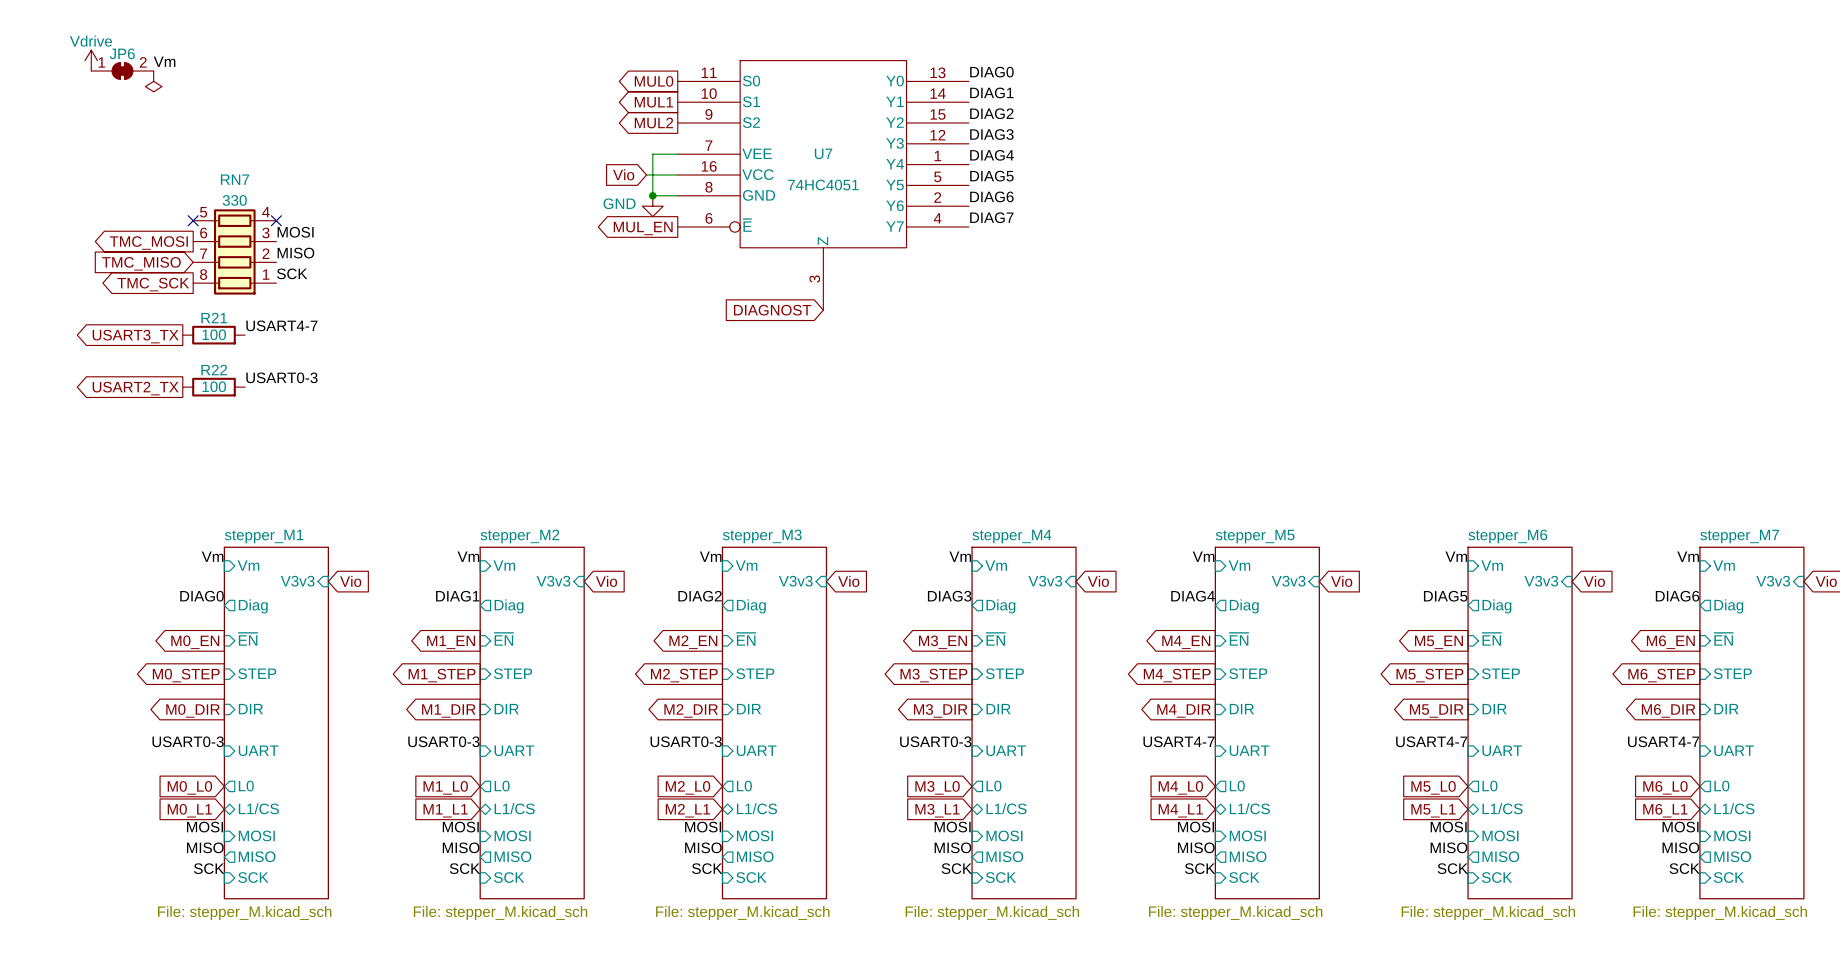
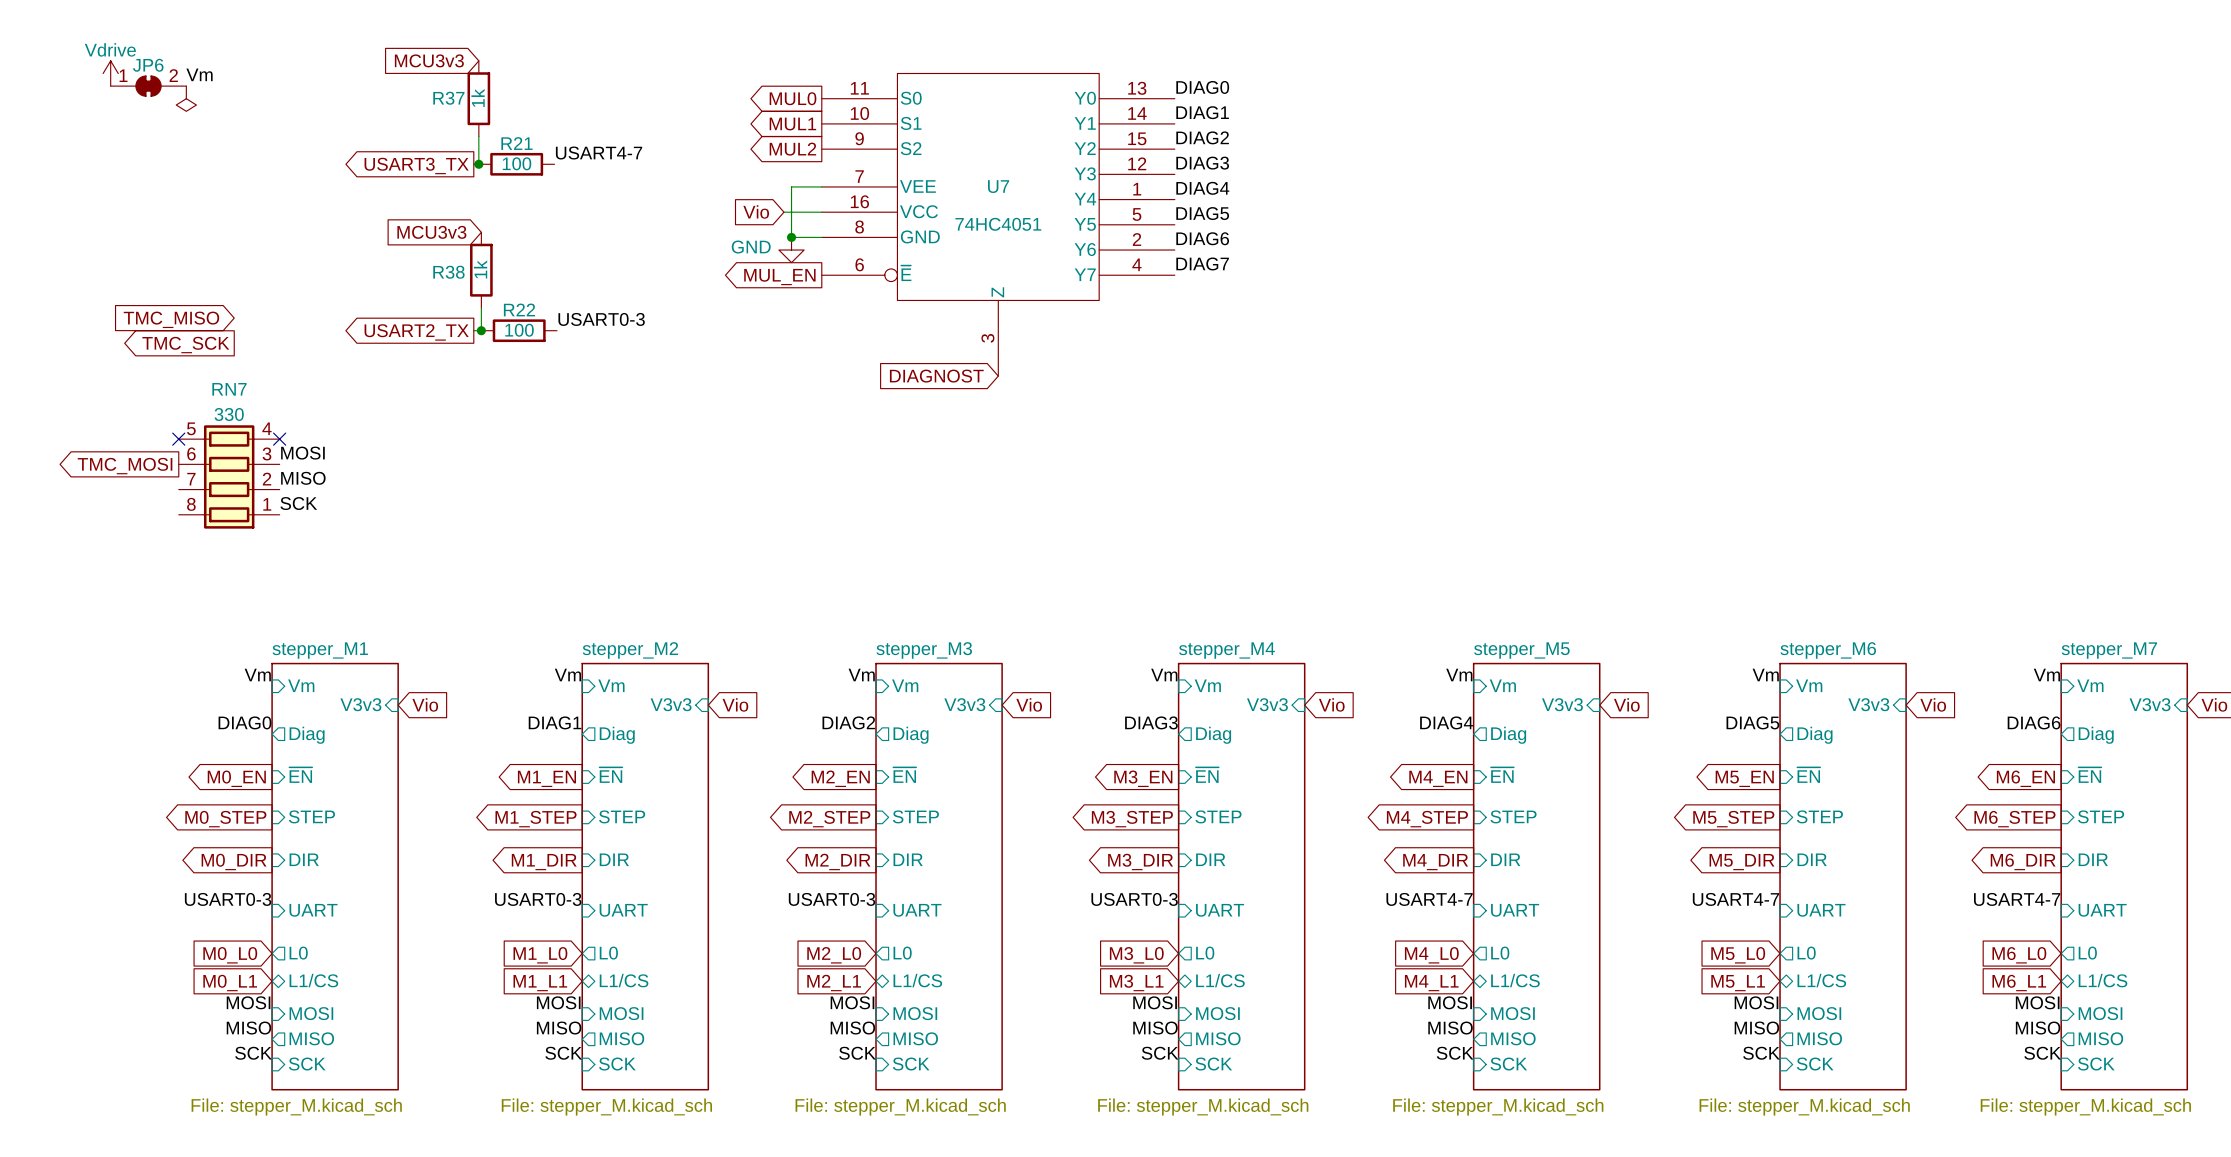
global label: none -> MCU3v3 (429, 60)
R37: none -> 1k (478, 98)
wire: none -> (478, 136) (478, 164) (473, 164)
label: none -> USART4-7 (599, 153)
junction: none -> (478, 164)
global label: none -> USART3_TX (416, 166)
global label: none -> MCU3v3 (431, 232)
no-connect mark: (193, 220) -> none
no-connect mark: (276, 220) -> none
R38: none -> 1k (481, 270)
label position: MOSI (295, 232) -> MOSI (302, 453)
global label position: TMC_MOSI (148, 242) -> TMC_MOSI (125, 466)
RN7 position: (234, 251) -> (229, 476)
label position: MISO (295, 253) -> MISO (303, 478)
wire: none -> (481, 308) (481, 330) (473, 330)
label: none -> USART0-3 (601, 319)
junction: none -> (481, 330)
label position: SCK (292, 273) -> SCK (298, 503)
global label: none -> USART2_TX (416, 332)
label: USART4-7 (281, 325) -> none
R21 position: (213, 335) -> (516, 164)
global label: USART3_TX (135, 336) -> none
no-connect mark: none -> (178, 439)
no-connect mark: none -> (279, 439)
label: USART0-3 (281, 377) -> none
R22 position: (213, 387) -> (519, 330)
global label: USART2_TX (135, 388) -> none

